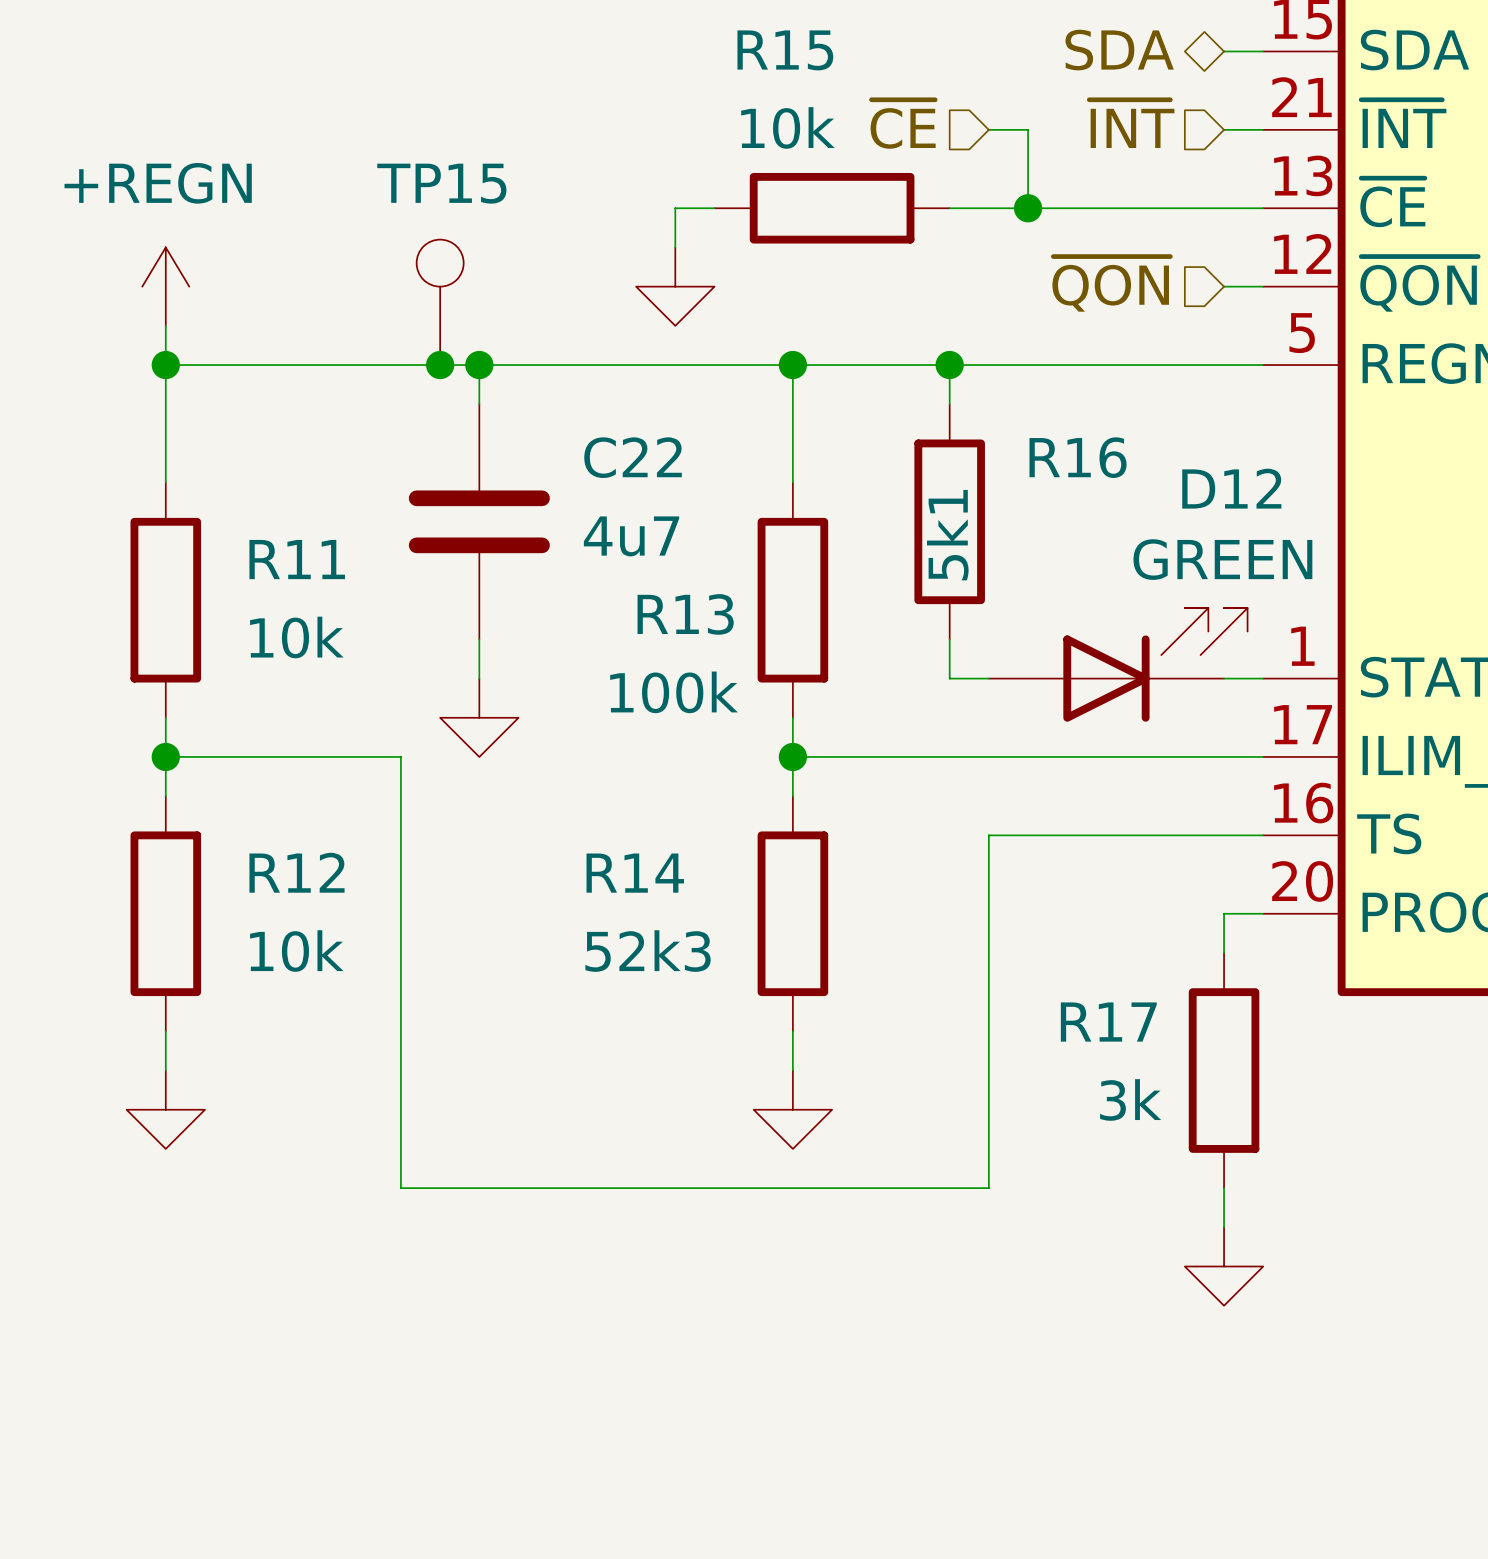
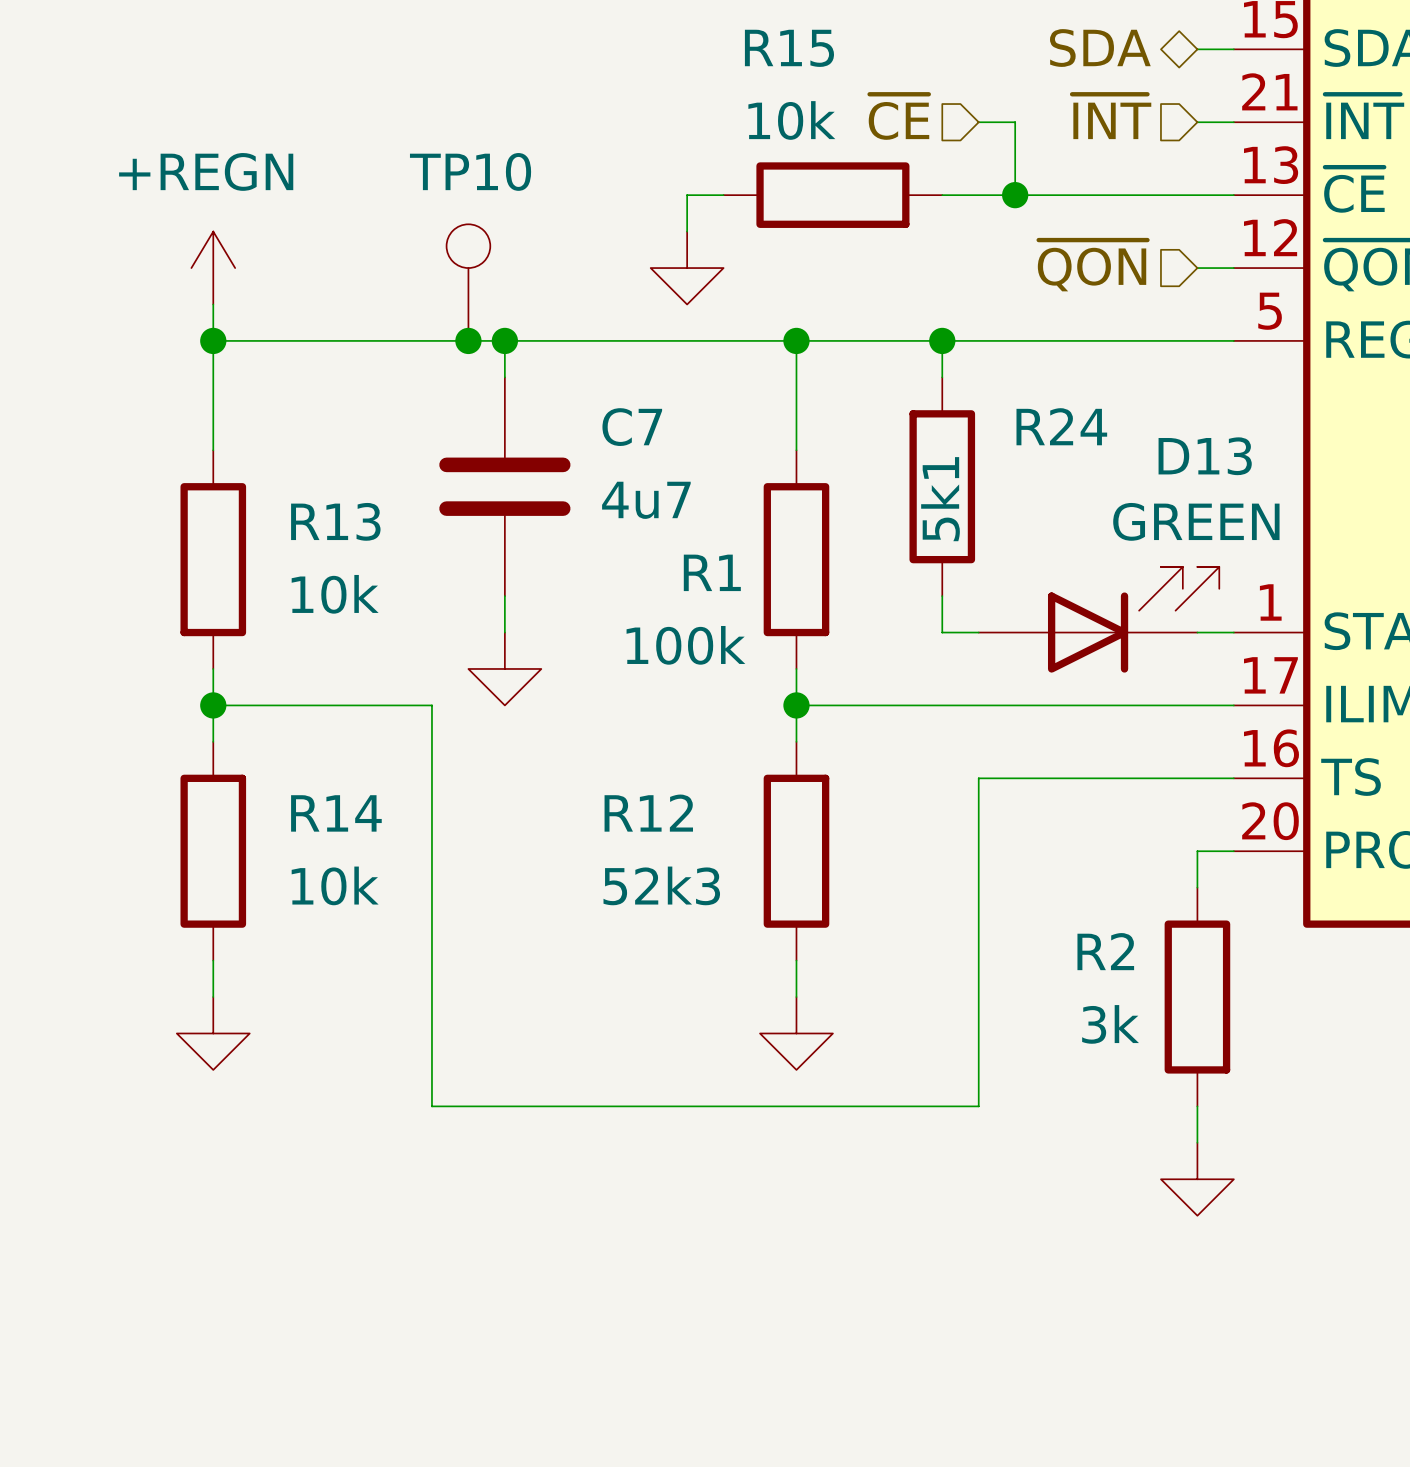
TP15 name: TP15 (441, 183) -> TP10 (470, 171)
C22 name: C22 (633, 457) -> C7 (632, 427)
R16 name: R16 (1078, 457) -> R24 (1061, 426)
D12 name: D12 (1231, 488) -> D13 (1205, 456)
R11 name: R11 (297, 559) -> R13 (335, 521)
R13 name: R13 (685, 614) -> R1 (712, 572)
R12 name: R12 (297, 872) -> R14 (336, 813)
R14 name: R14 (635, 873) -> R12 (648, 813)
R17 name: R17 (1108, 1022) -> R2 (1105, 951)

